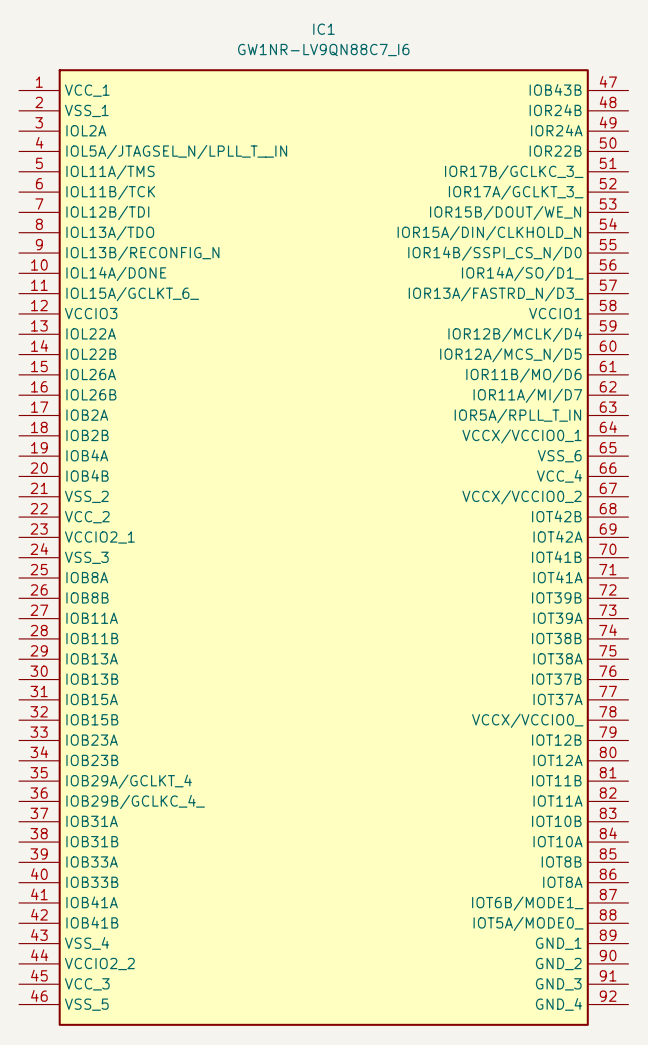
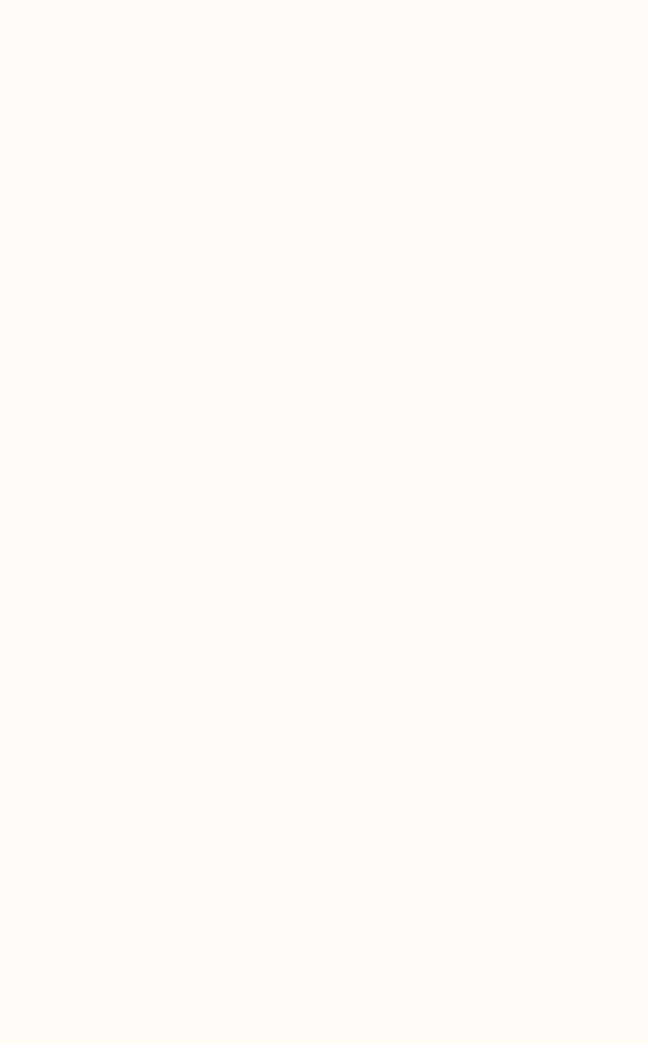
IC1: GW1NR-LV9QN88C7_I6 (323, 547) -> none

